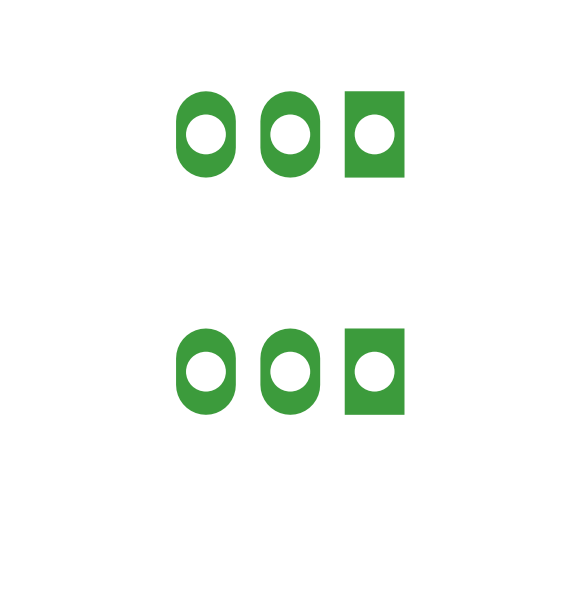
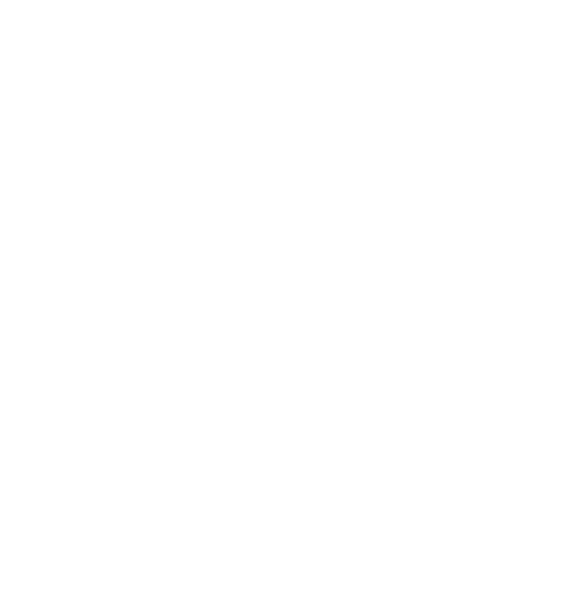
part: (290, 134) -> none
part: (290, 371) -> none

